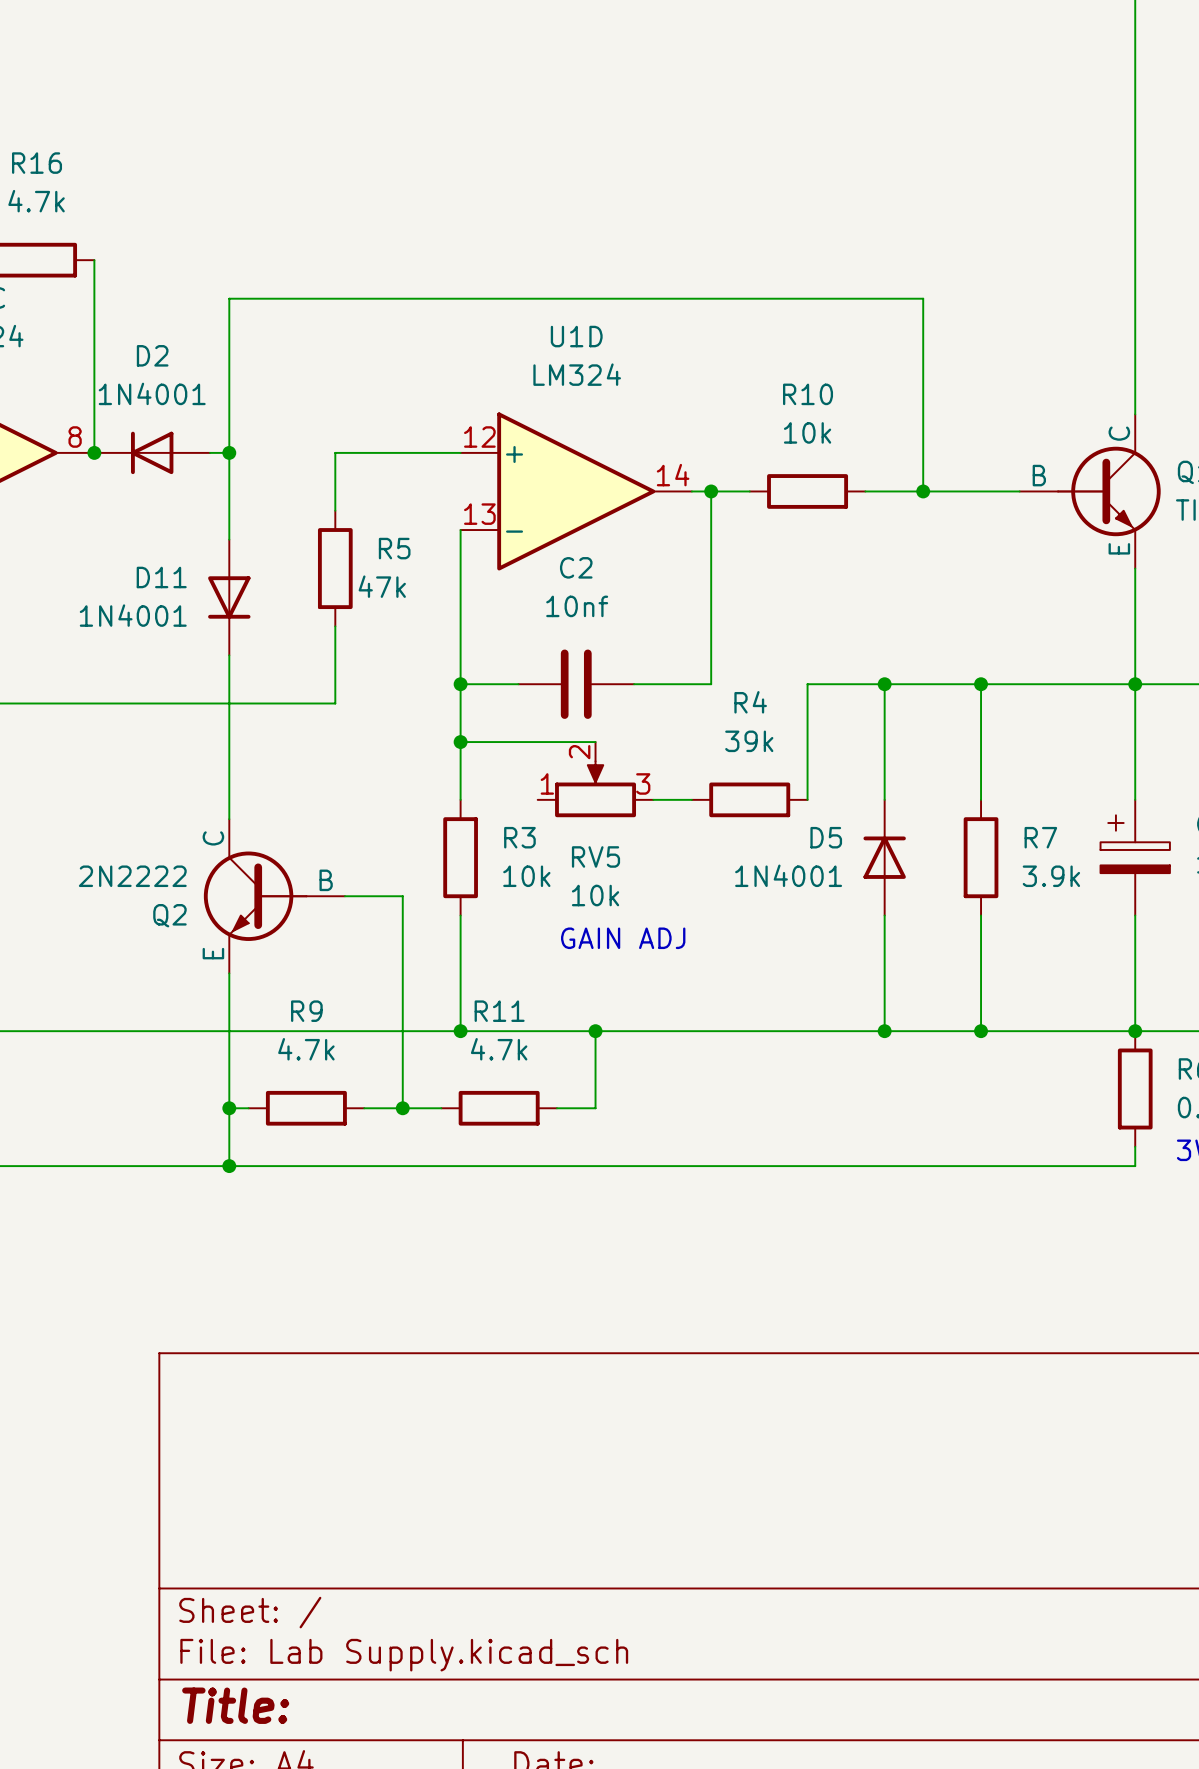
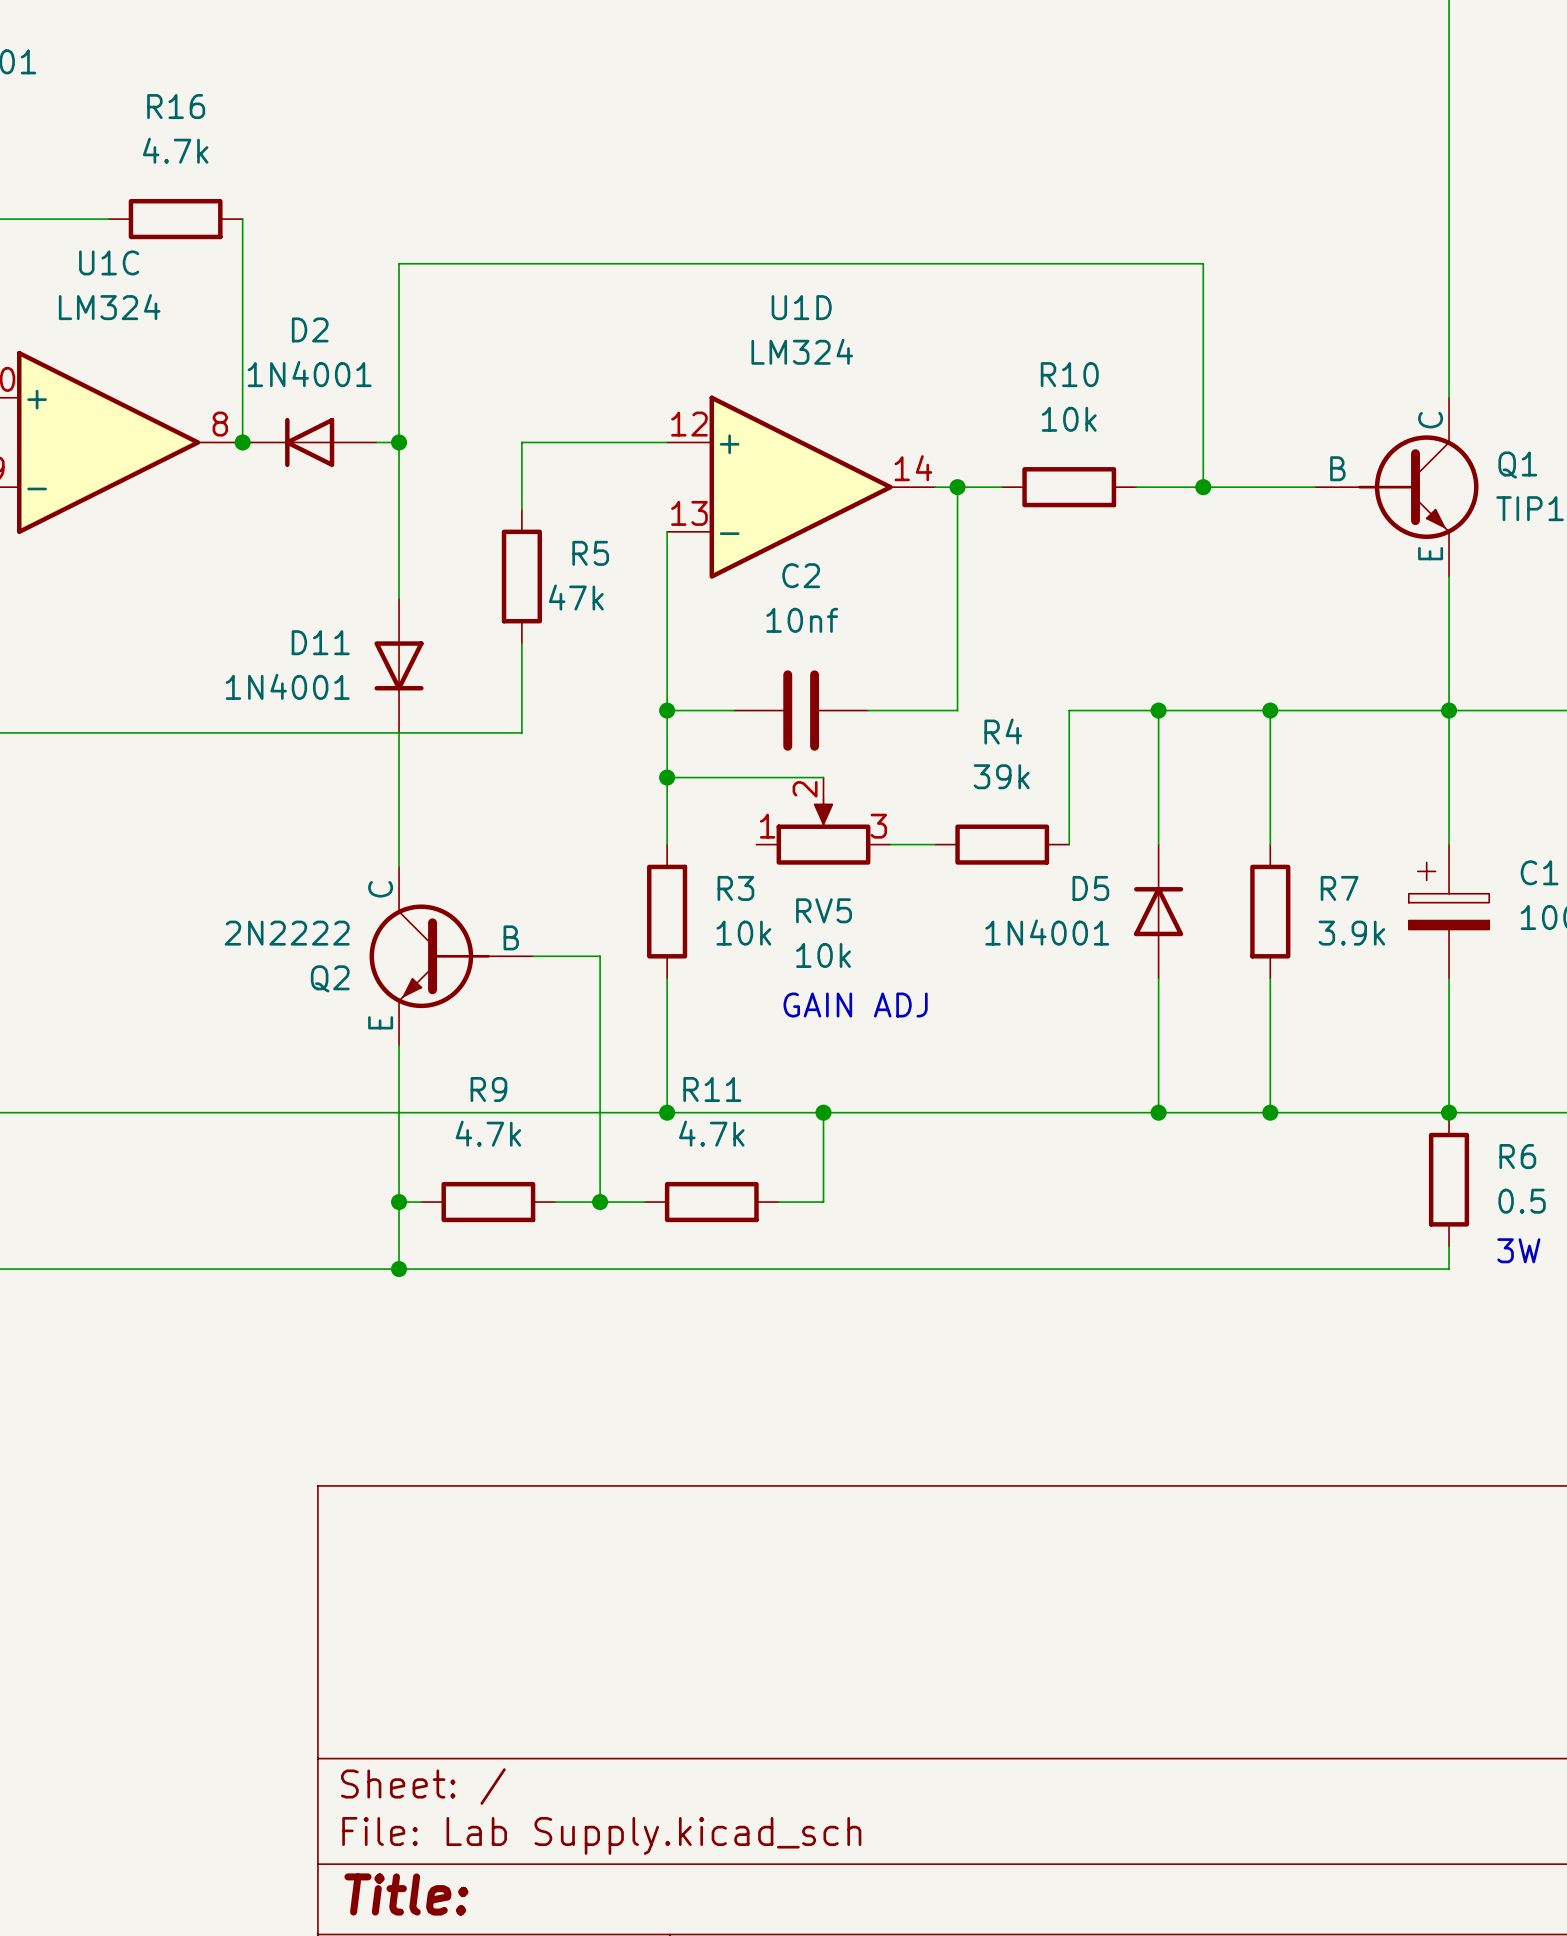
D11 position: (229, 597) -> (399, 665)

